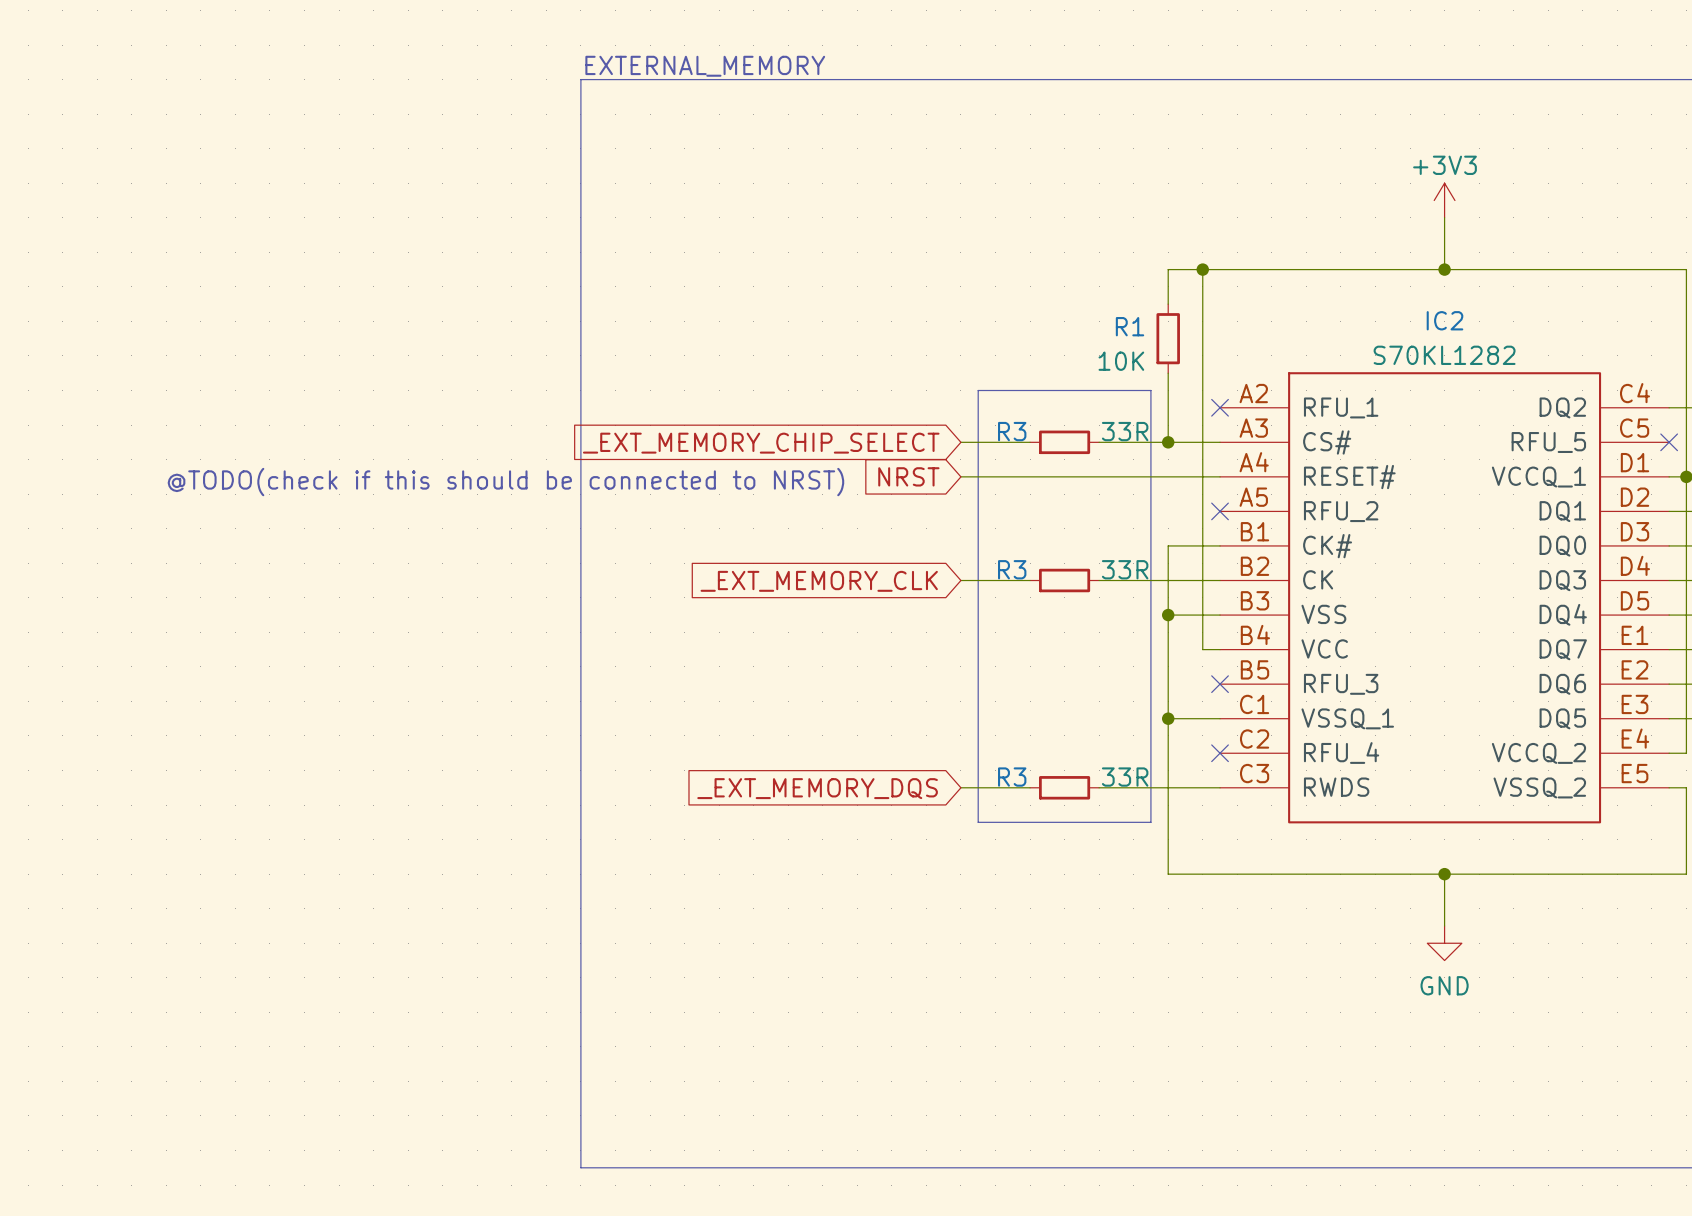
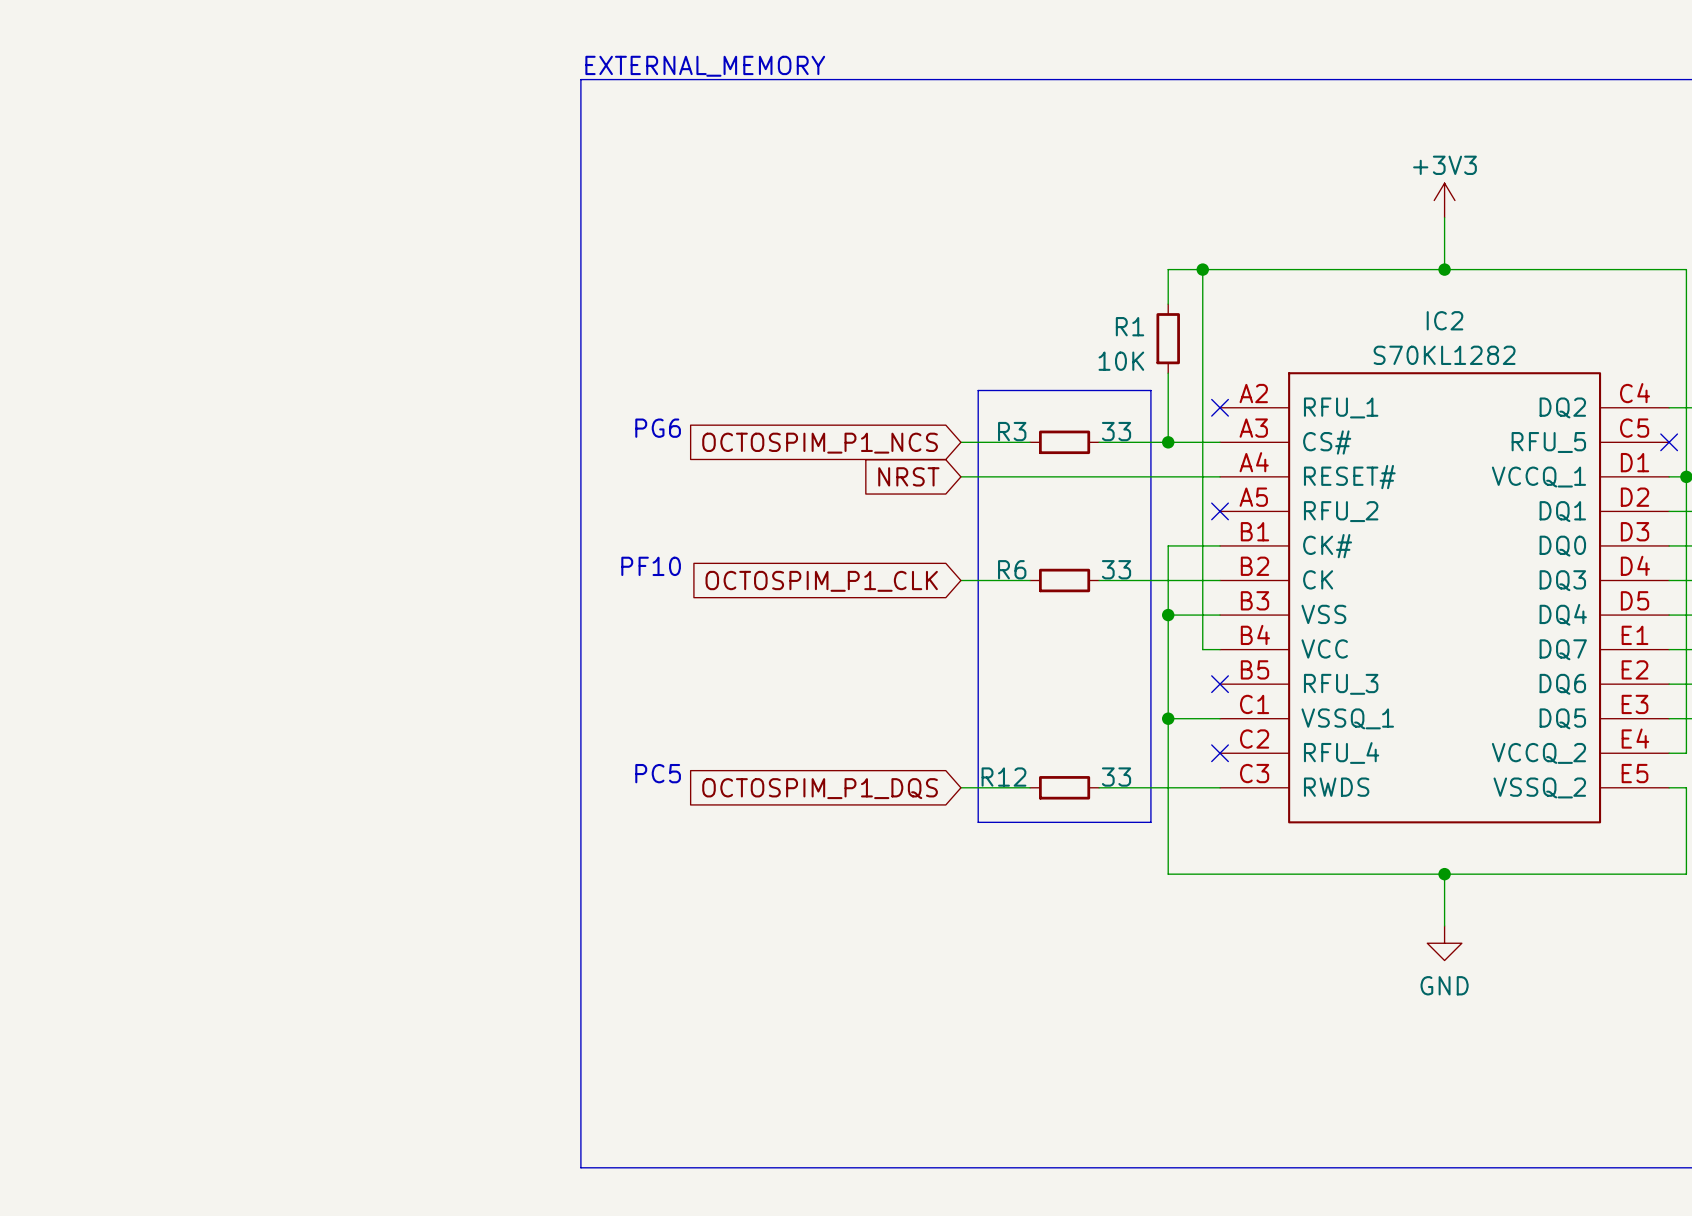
text: none -> PG6 (658, 428)
R3 value: 33R (1125, 431) -> 33 (1116, 431)
global label: _EXT_MEMORY_CHIP_SELECT (761, 443) -> OCTOSPIM_P1_NCS (820, 443)
text: @TODO(check if this should be connected to NRST) (505, 482) -> none
text: none -> PF10 (651, 566)
R3 name: R3 (1012, 569) -> R6 (1012, 569)
R3 value: 33R (1125, 569) -> 33 (1116, 569)
global label: _EXT_MEMORY_CLK (819, 581) -> OCTOSPIM_P1_CLK (821, 581)
text: none -> PC5 (658, 773)
R3 name: R3 (1012, 777) -> R12 (1003, 777)
R3 value: 33R (1125, 777) -> 33 (1116, 777)
global label: _EXT_MEMORY_DQS (817, 788) -> OCTOSPIM_P1_DQS (820, 788)

